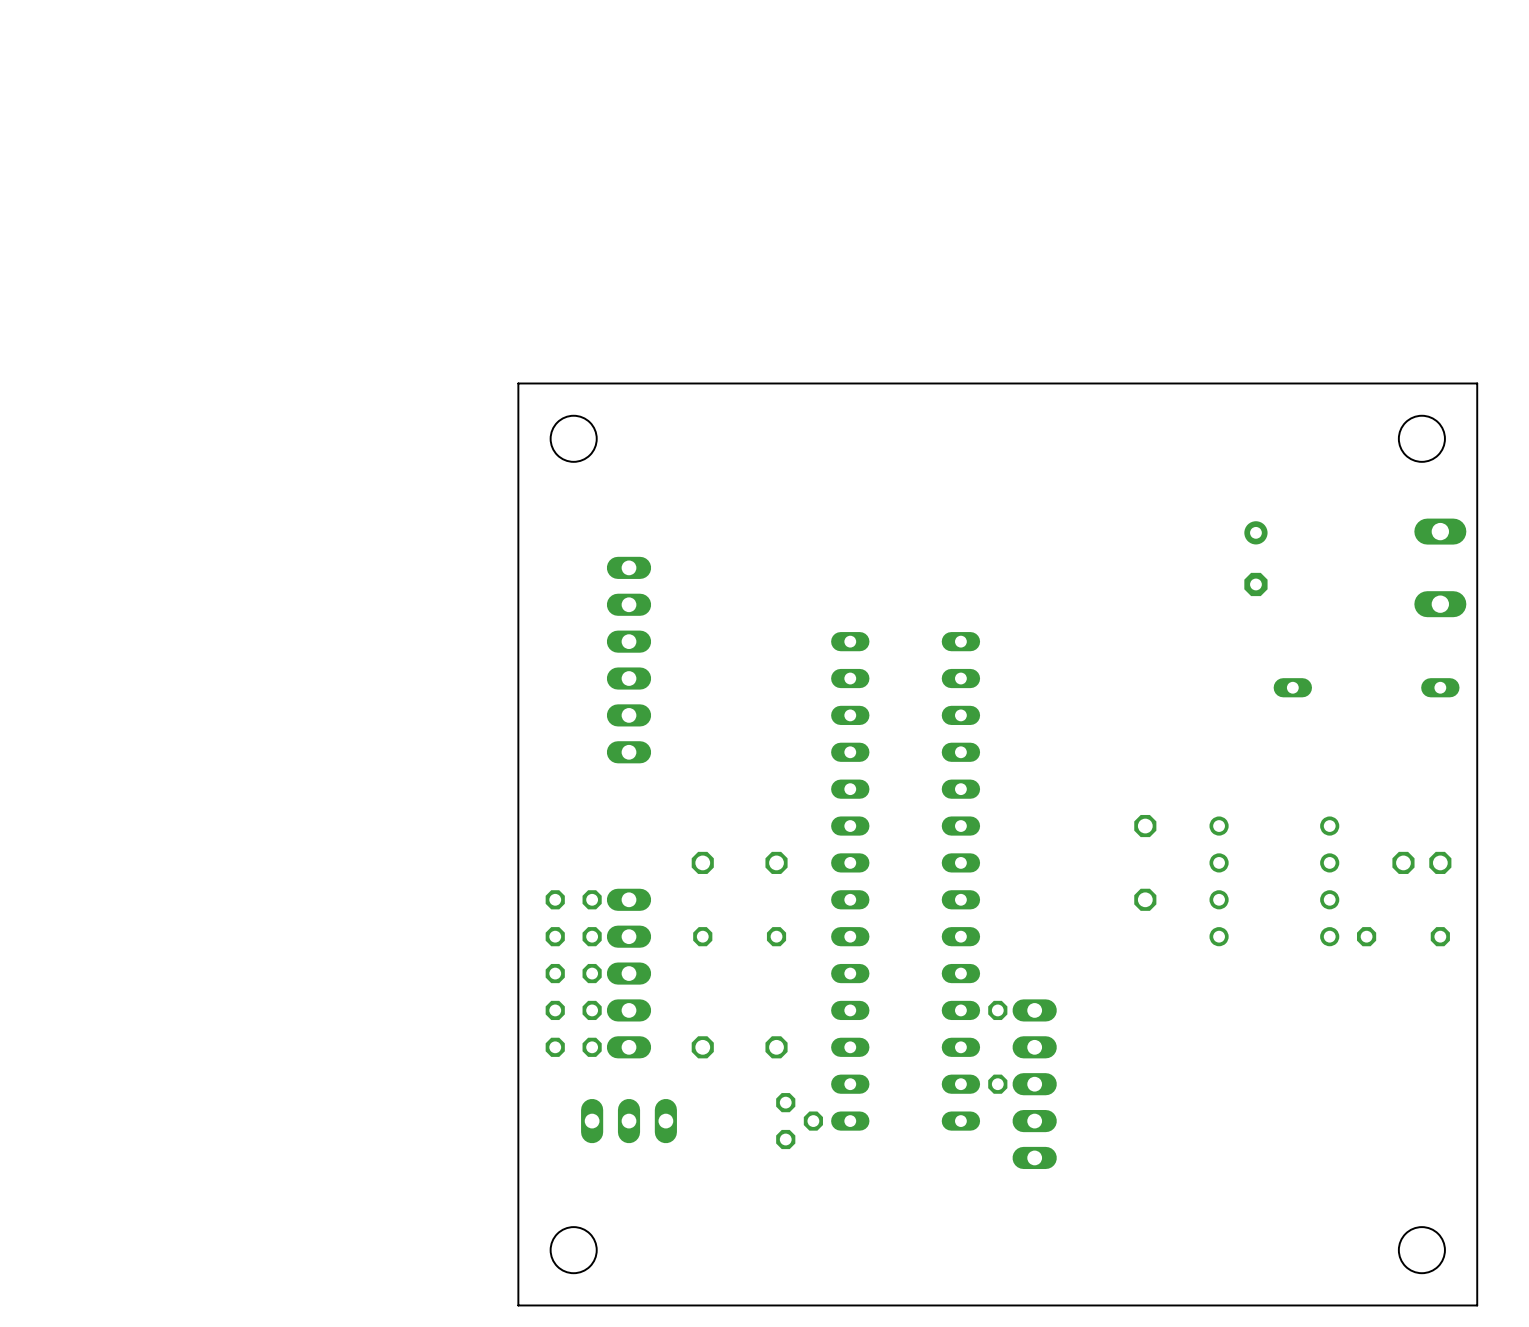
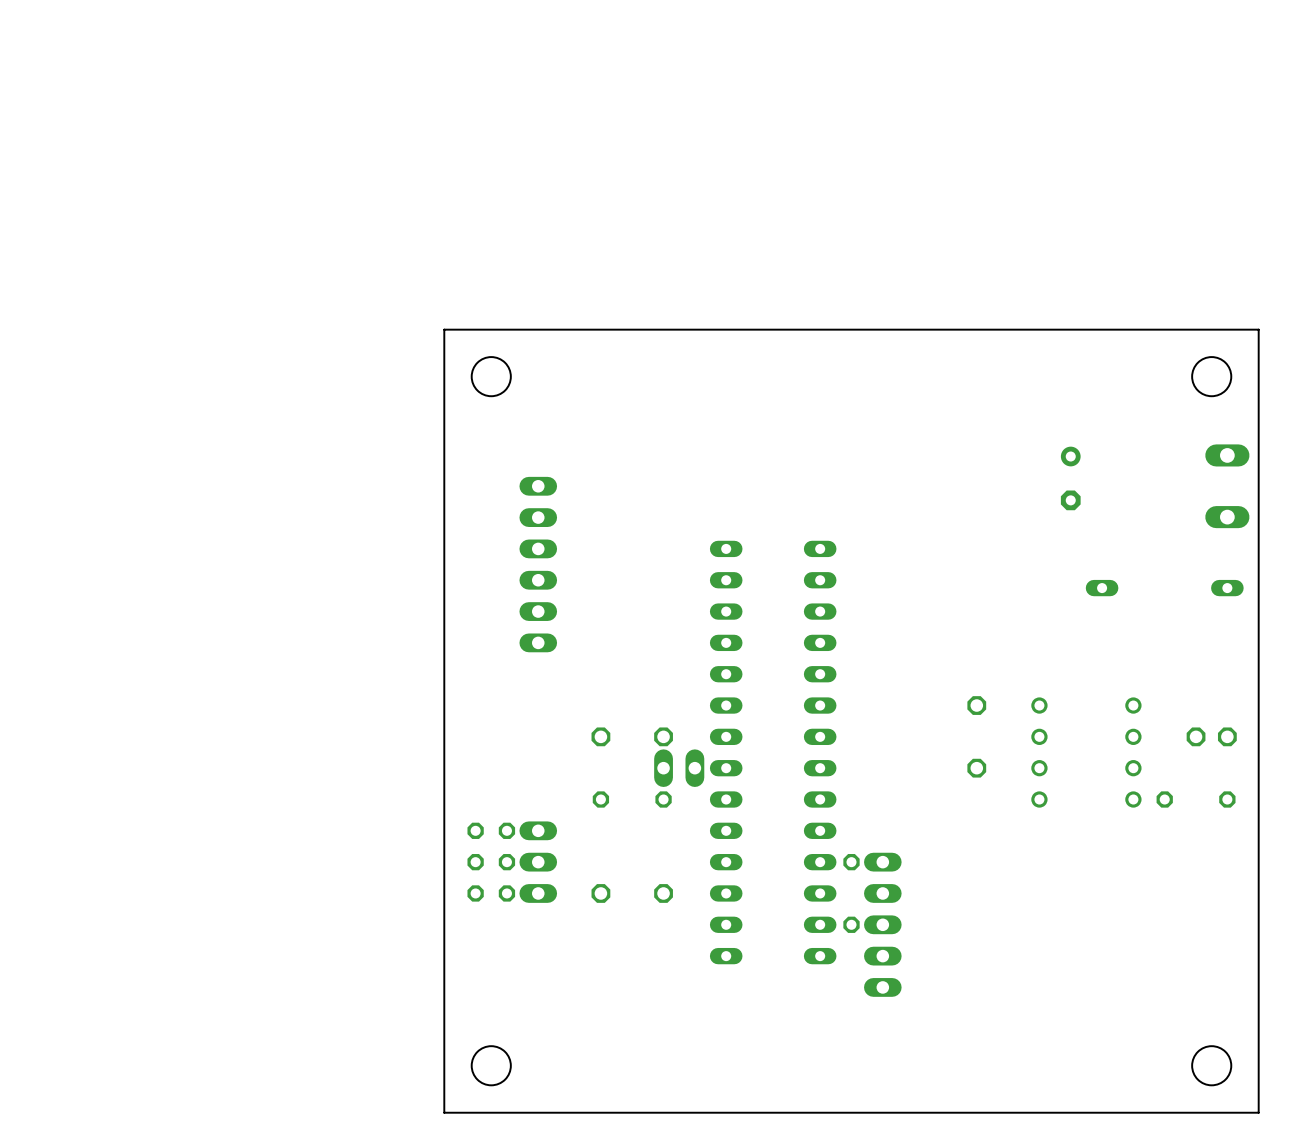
part: (573, 899) -> none
part: none -> (679, 768)
part: (573, 936) -> none
part: (629, 973) -> none
part rotation: 0° (629, 1121) -> 90° clockwise (538, 862)
part position: (629, 1121) -> (538, 862)
part: (799, 1121) -> none

